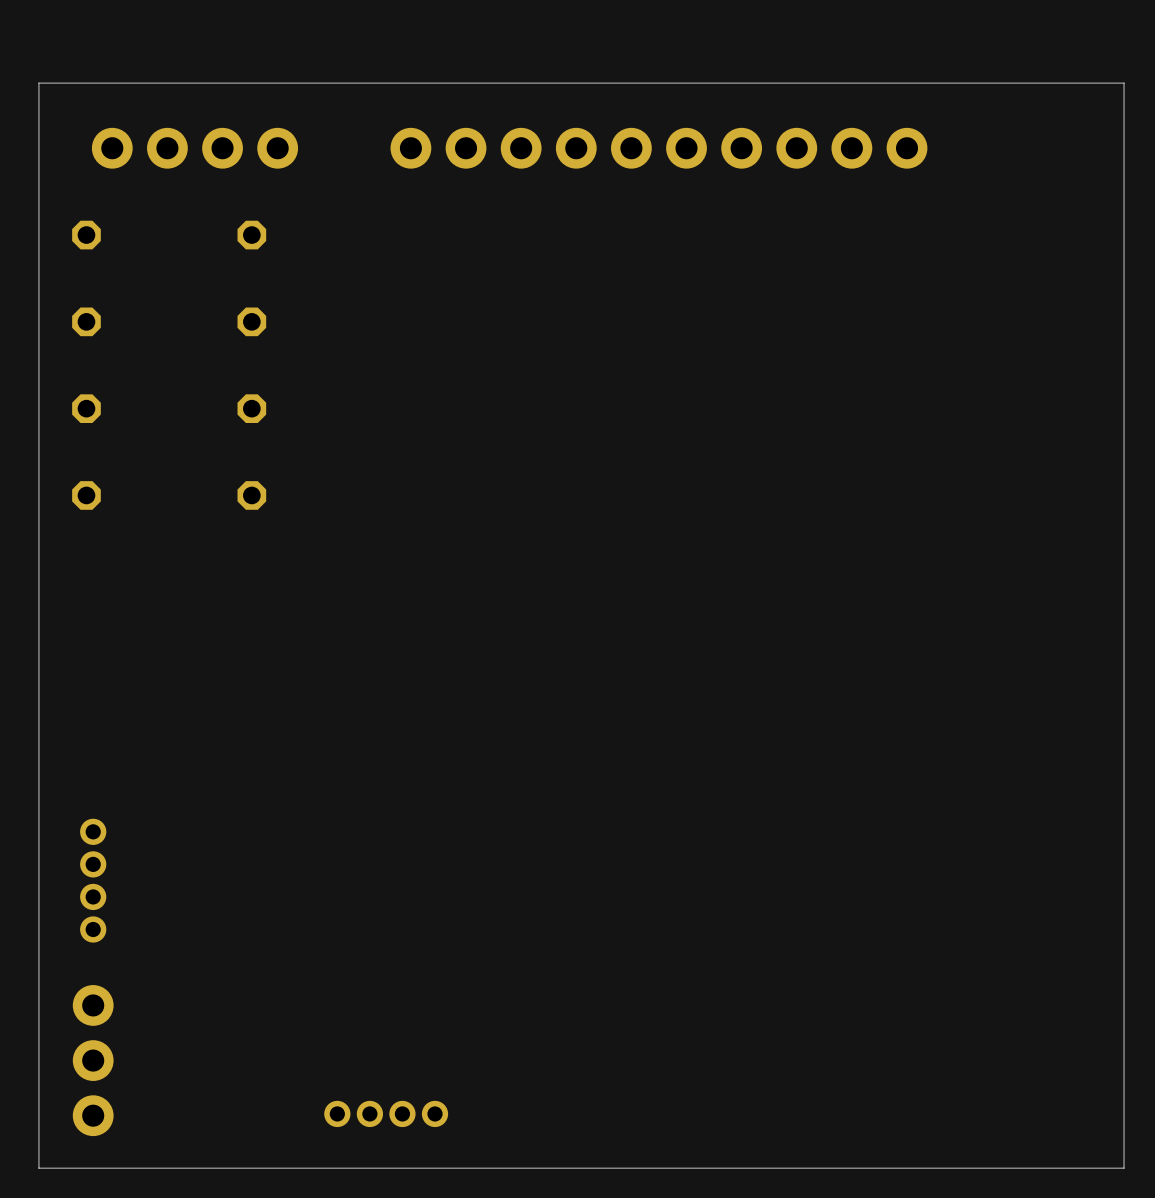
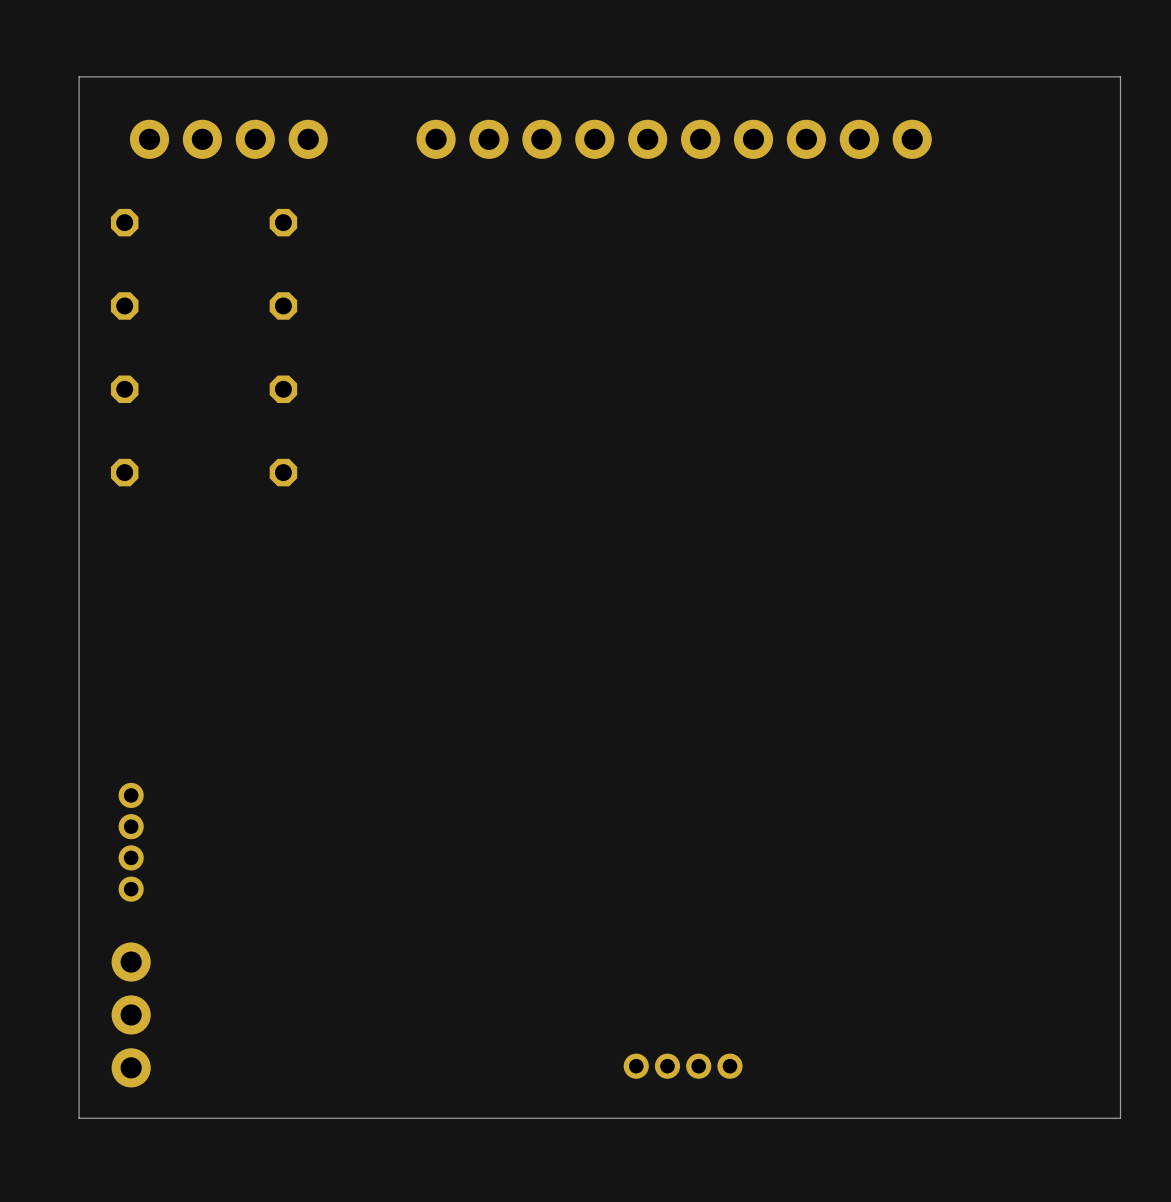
part position: (386, 1113) -> (683, 1066)

